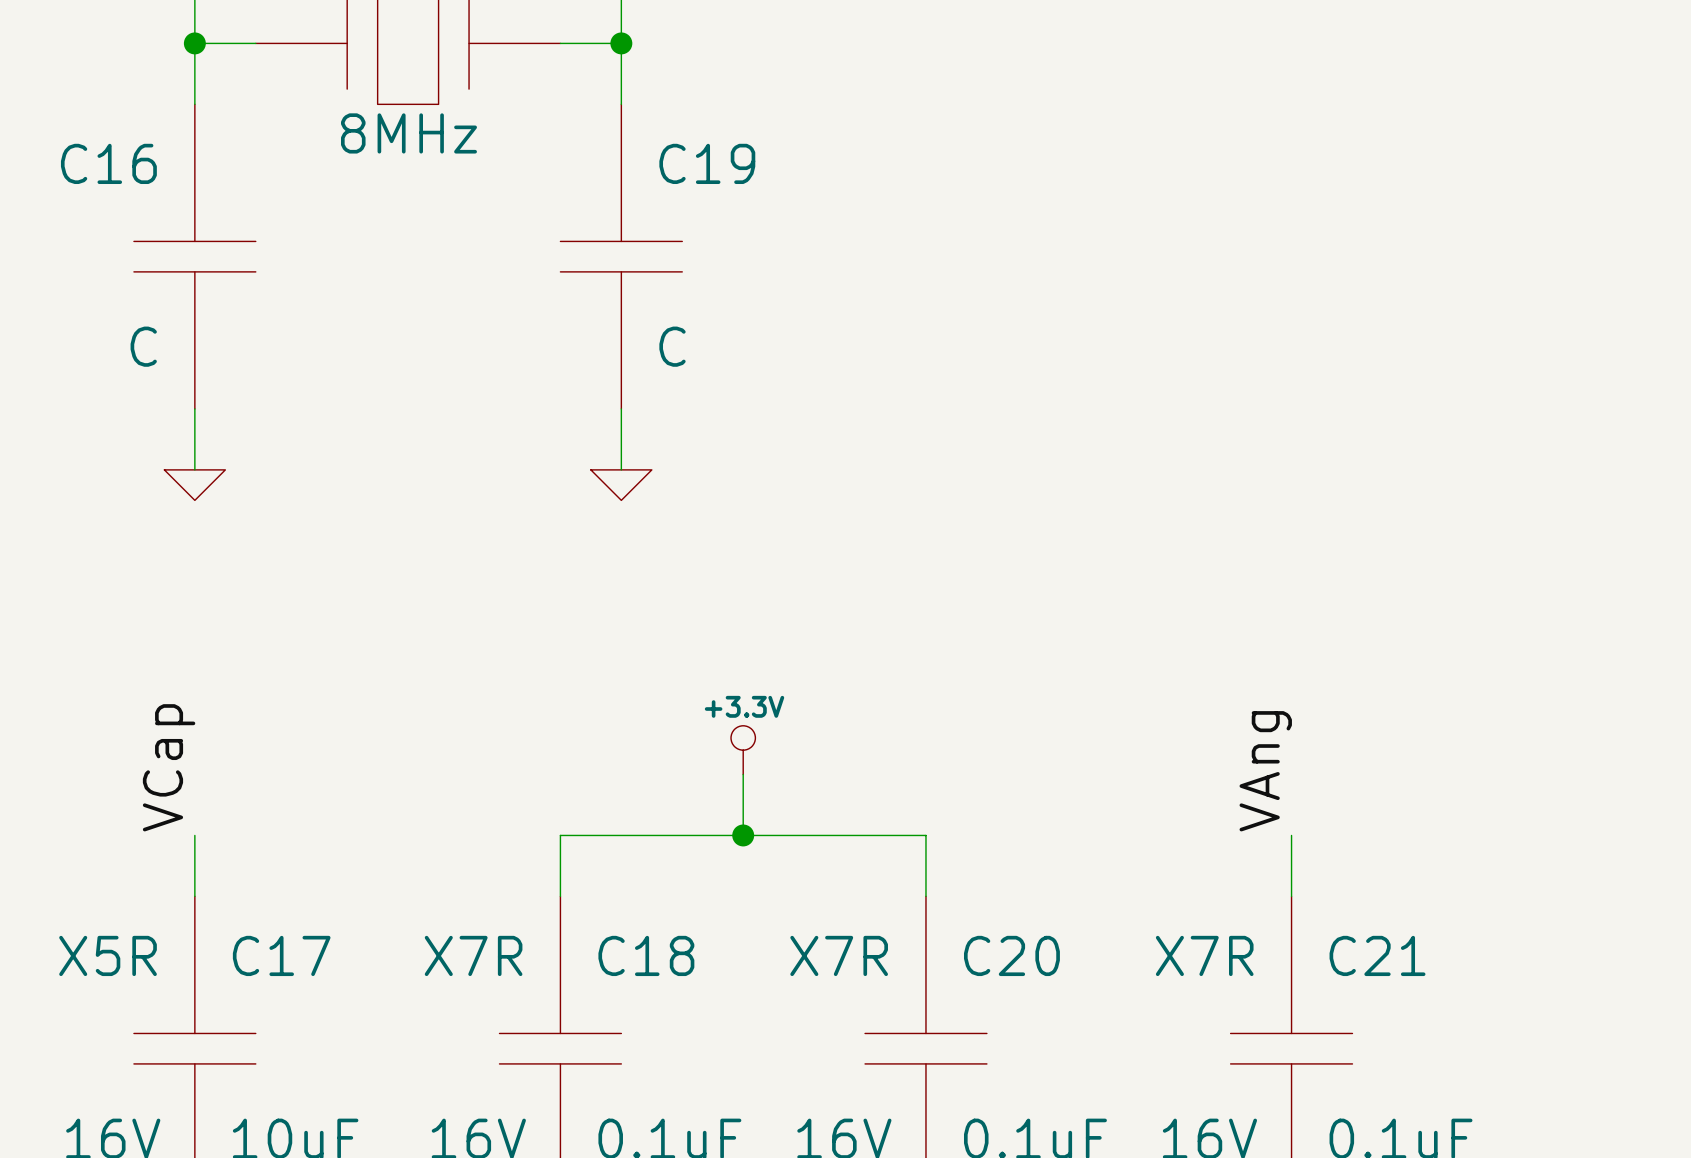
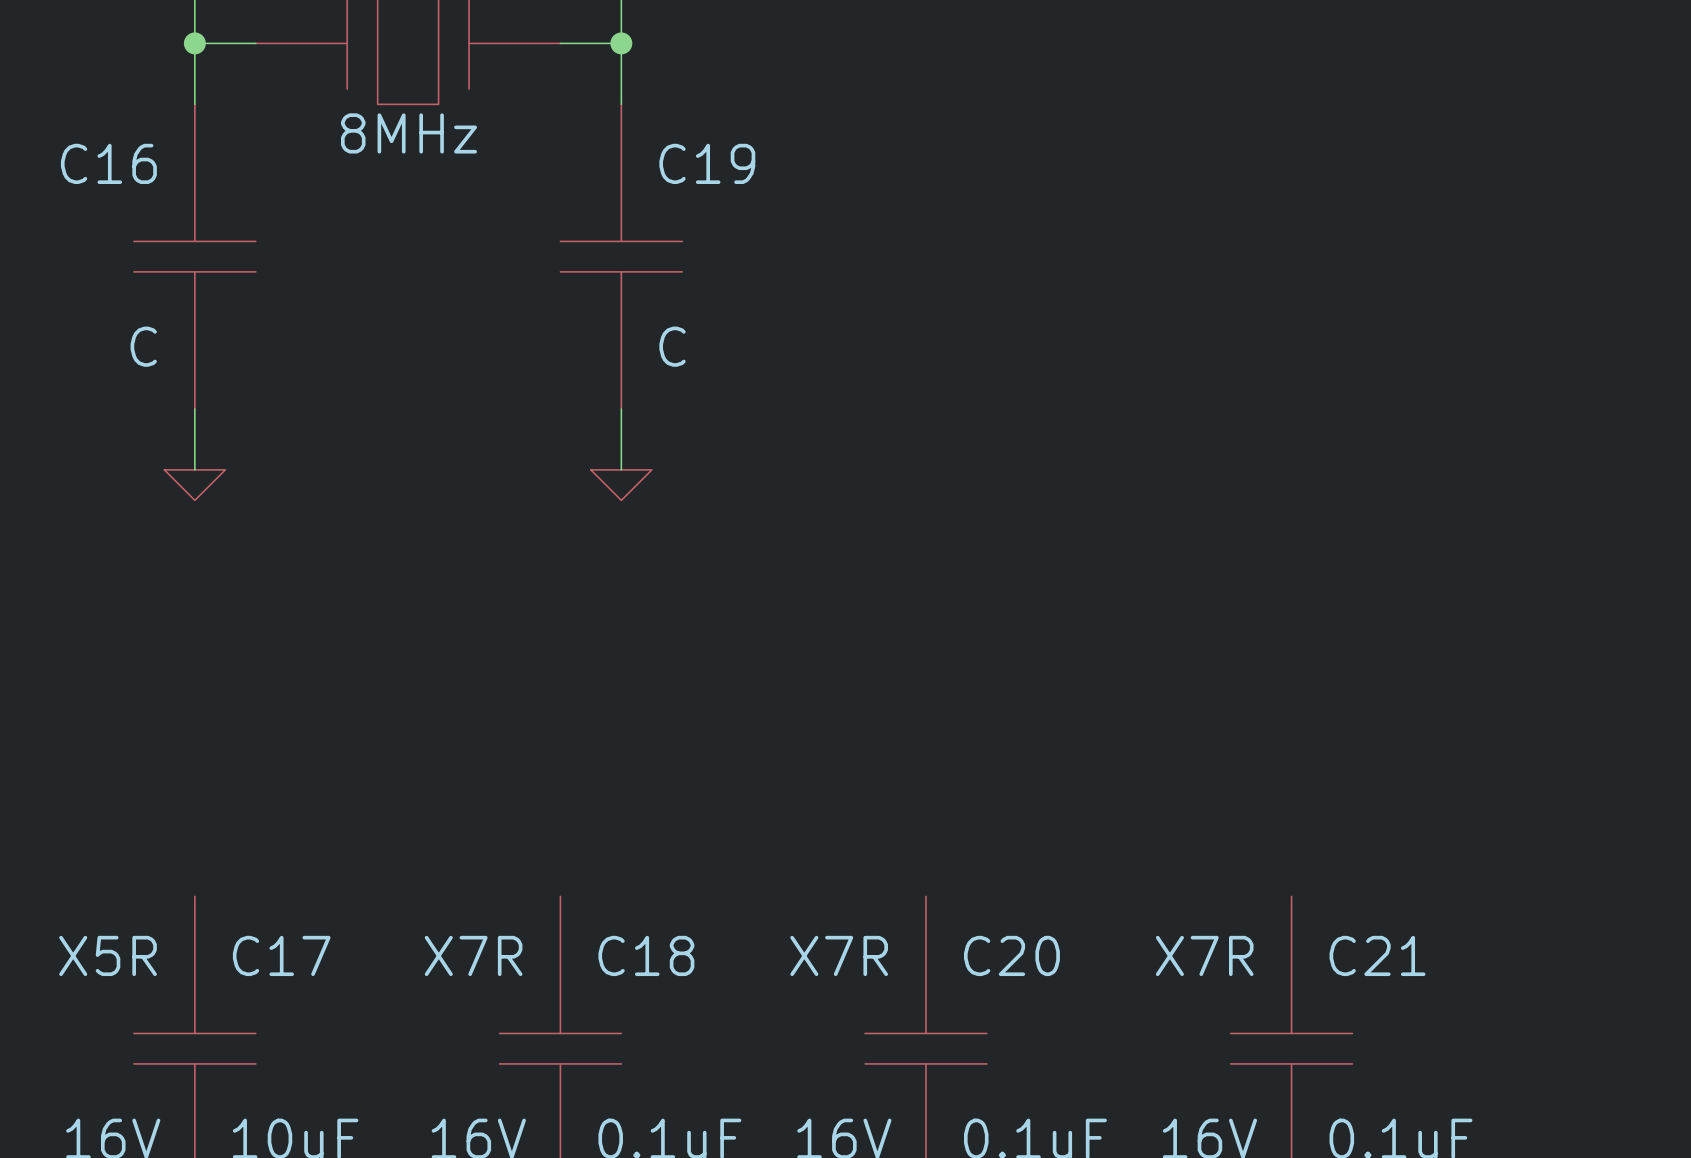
power symbol: +3.3V (743, 750) -> none
label: VCap (169, 767) -> none
label: VAng (1265, 771) -> none
wire: (743, 774) (743, 835) -> none
wire: (194, 835) (194, 896) -> none
junction: (743, 835) -> none
wire: (1291, 835) (1291, 896) -> none
wire: (560, 896) (560, 835) (925, 835) (925, 896) -> none

